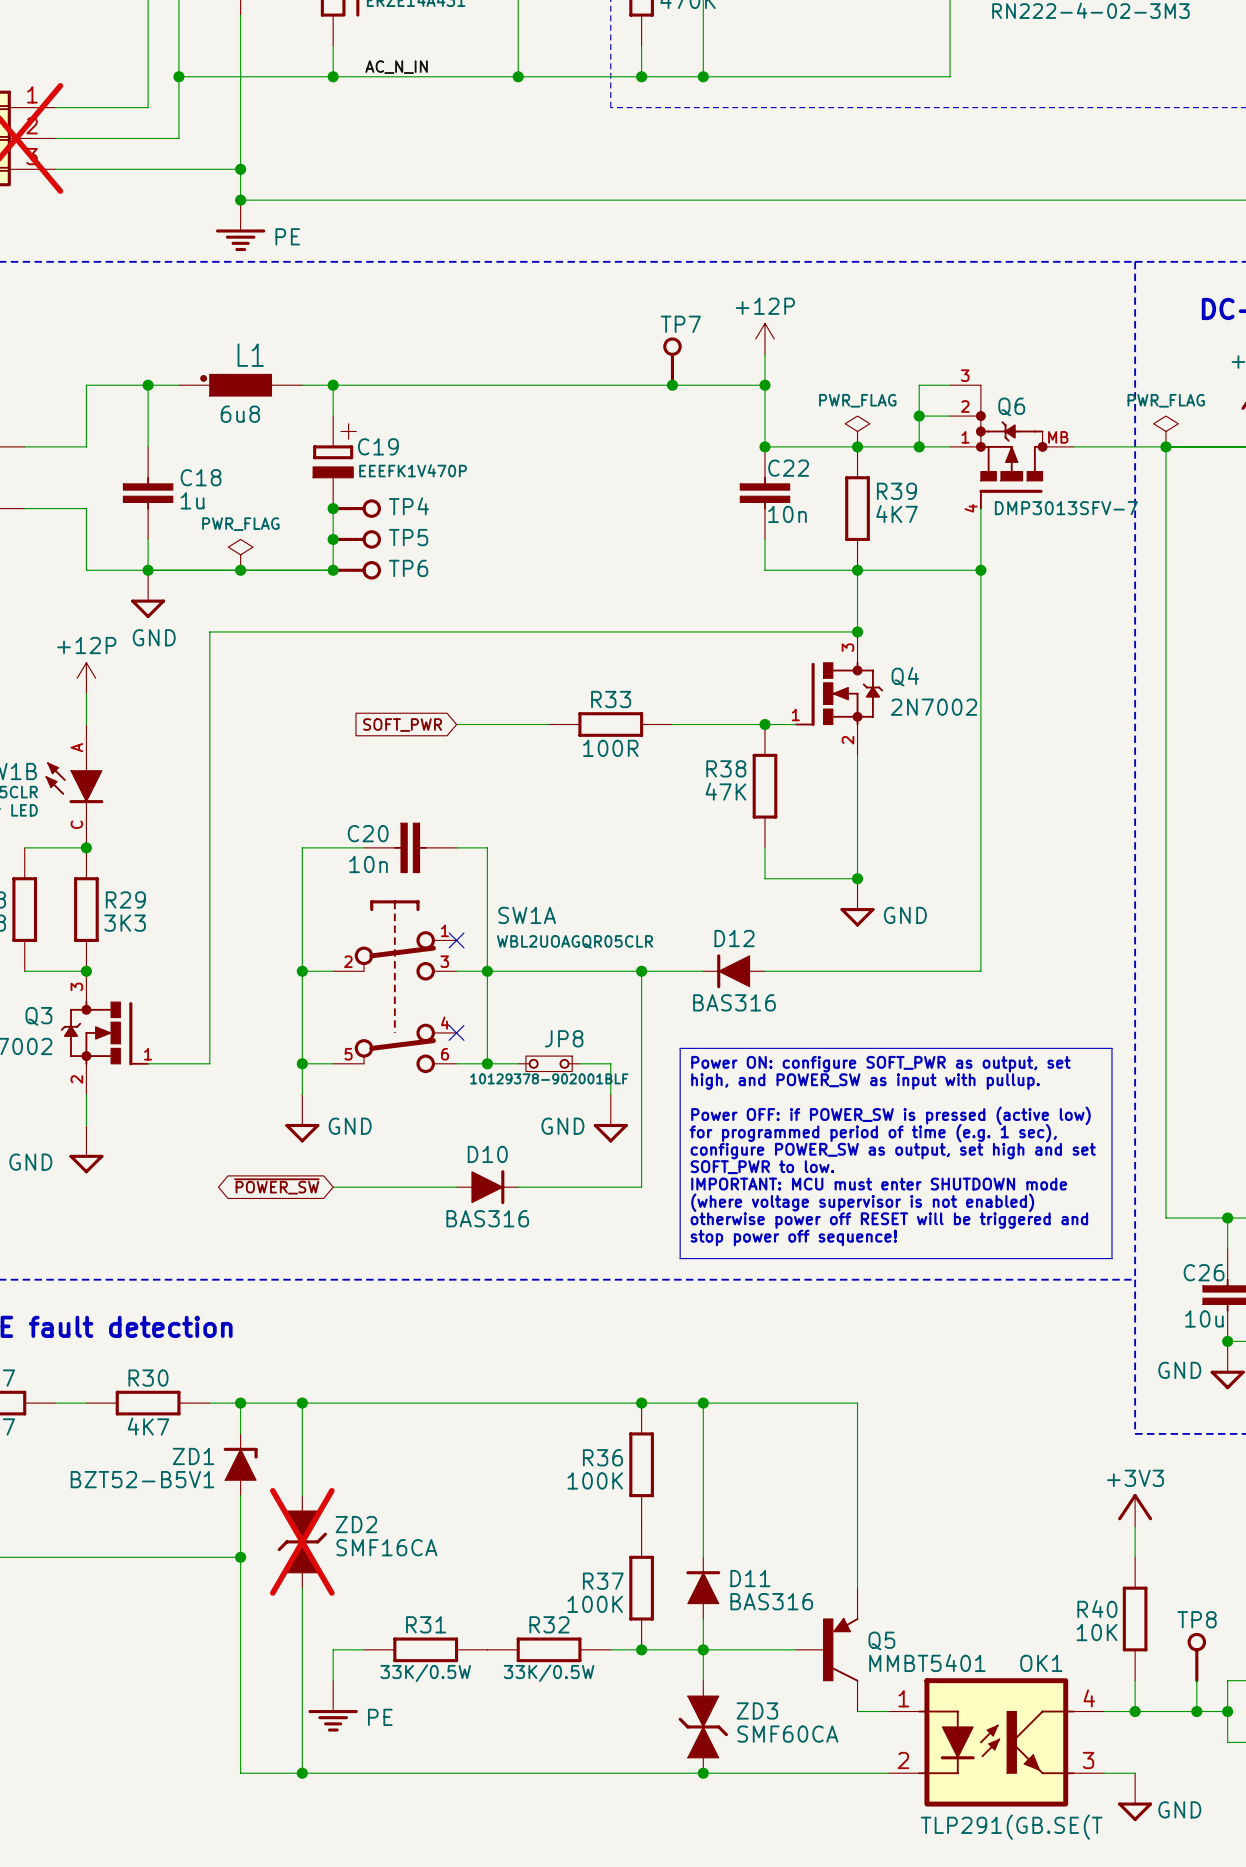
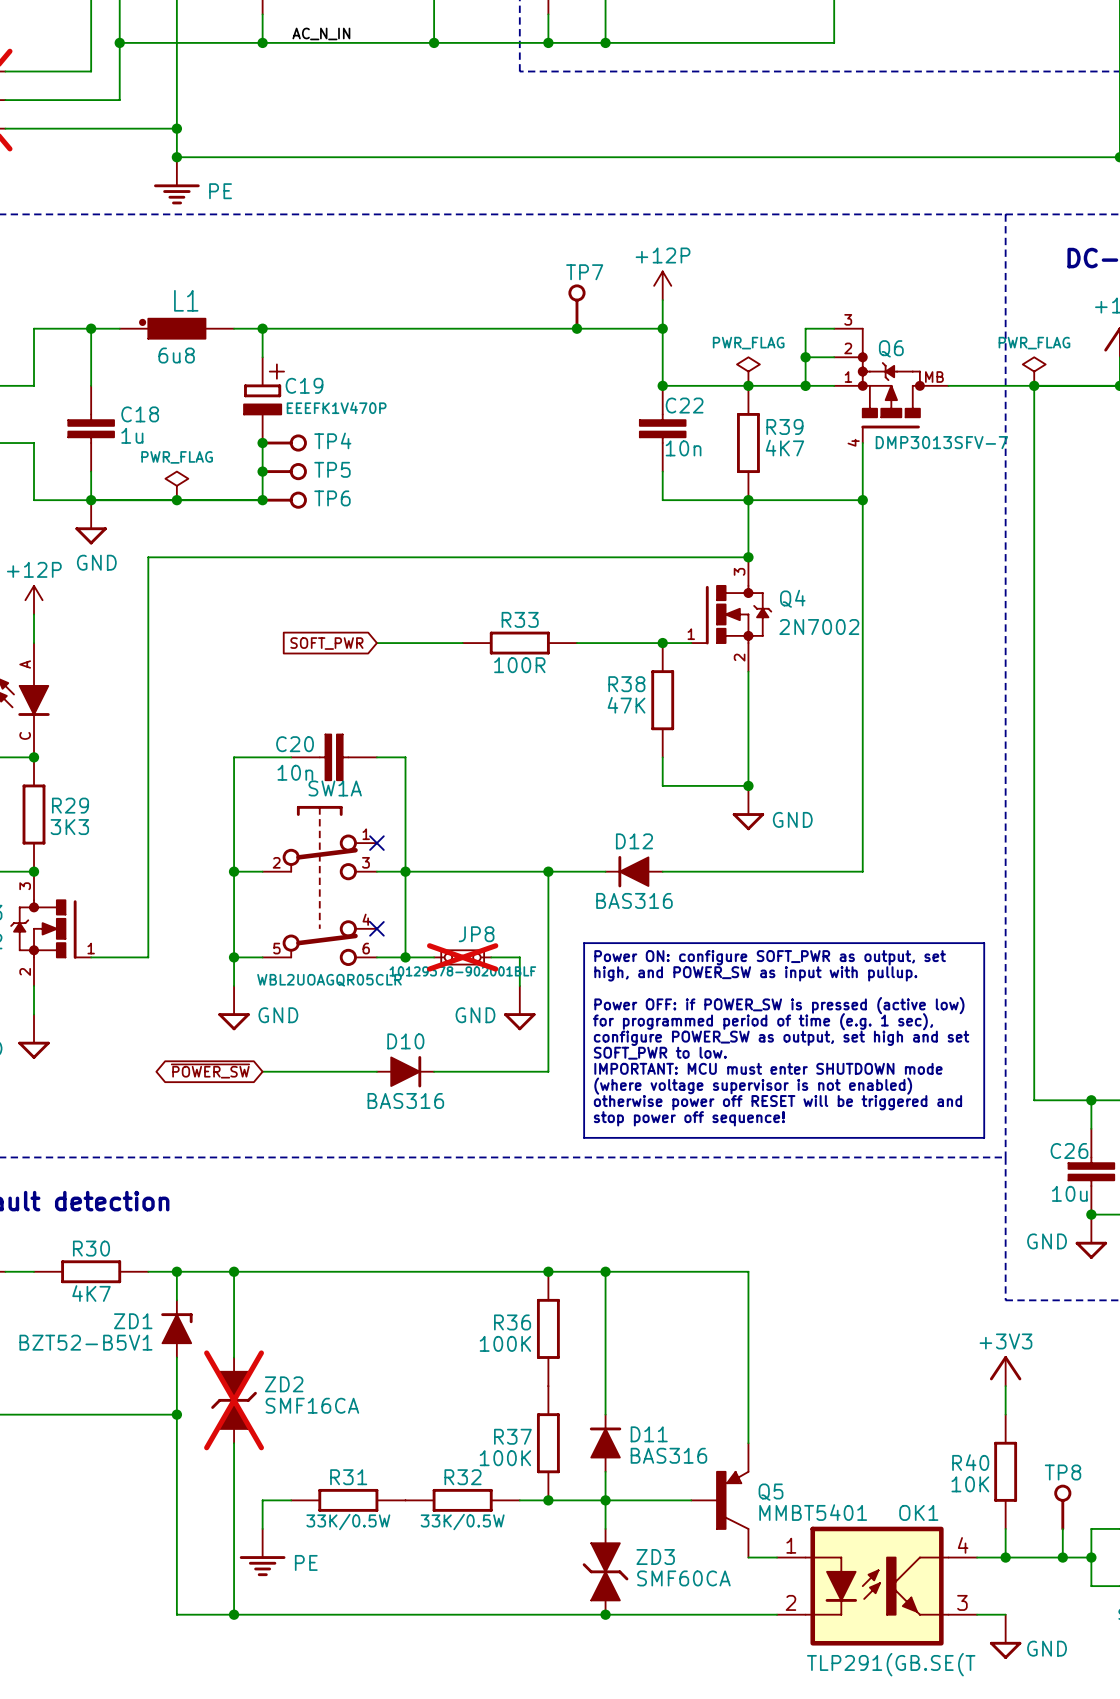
SW1A name position: SW1A (527, 915) -> SW1A (335, 788)
SW1A value position: WBL2UOAGQR05CLR (574, 941) -> WBL2UOAGQR05CLR (329, 980)
JP8 do-not-place cross: none -> (462, 957)

